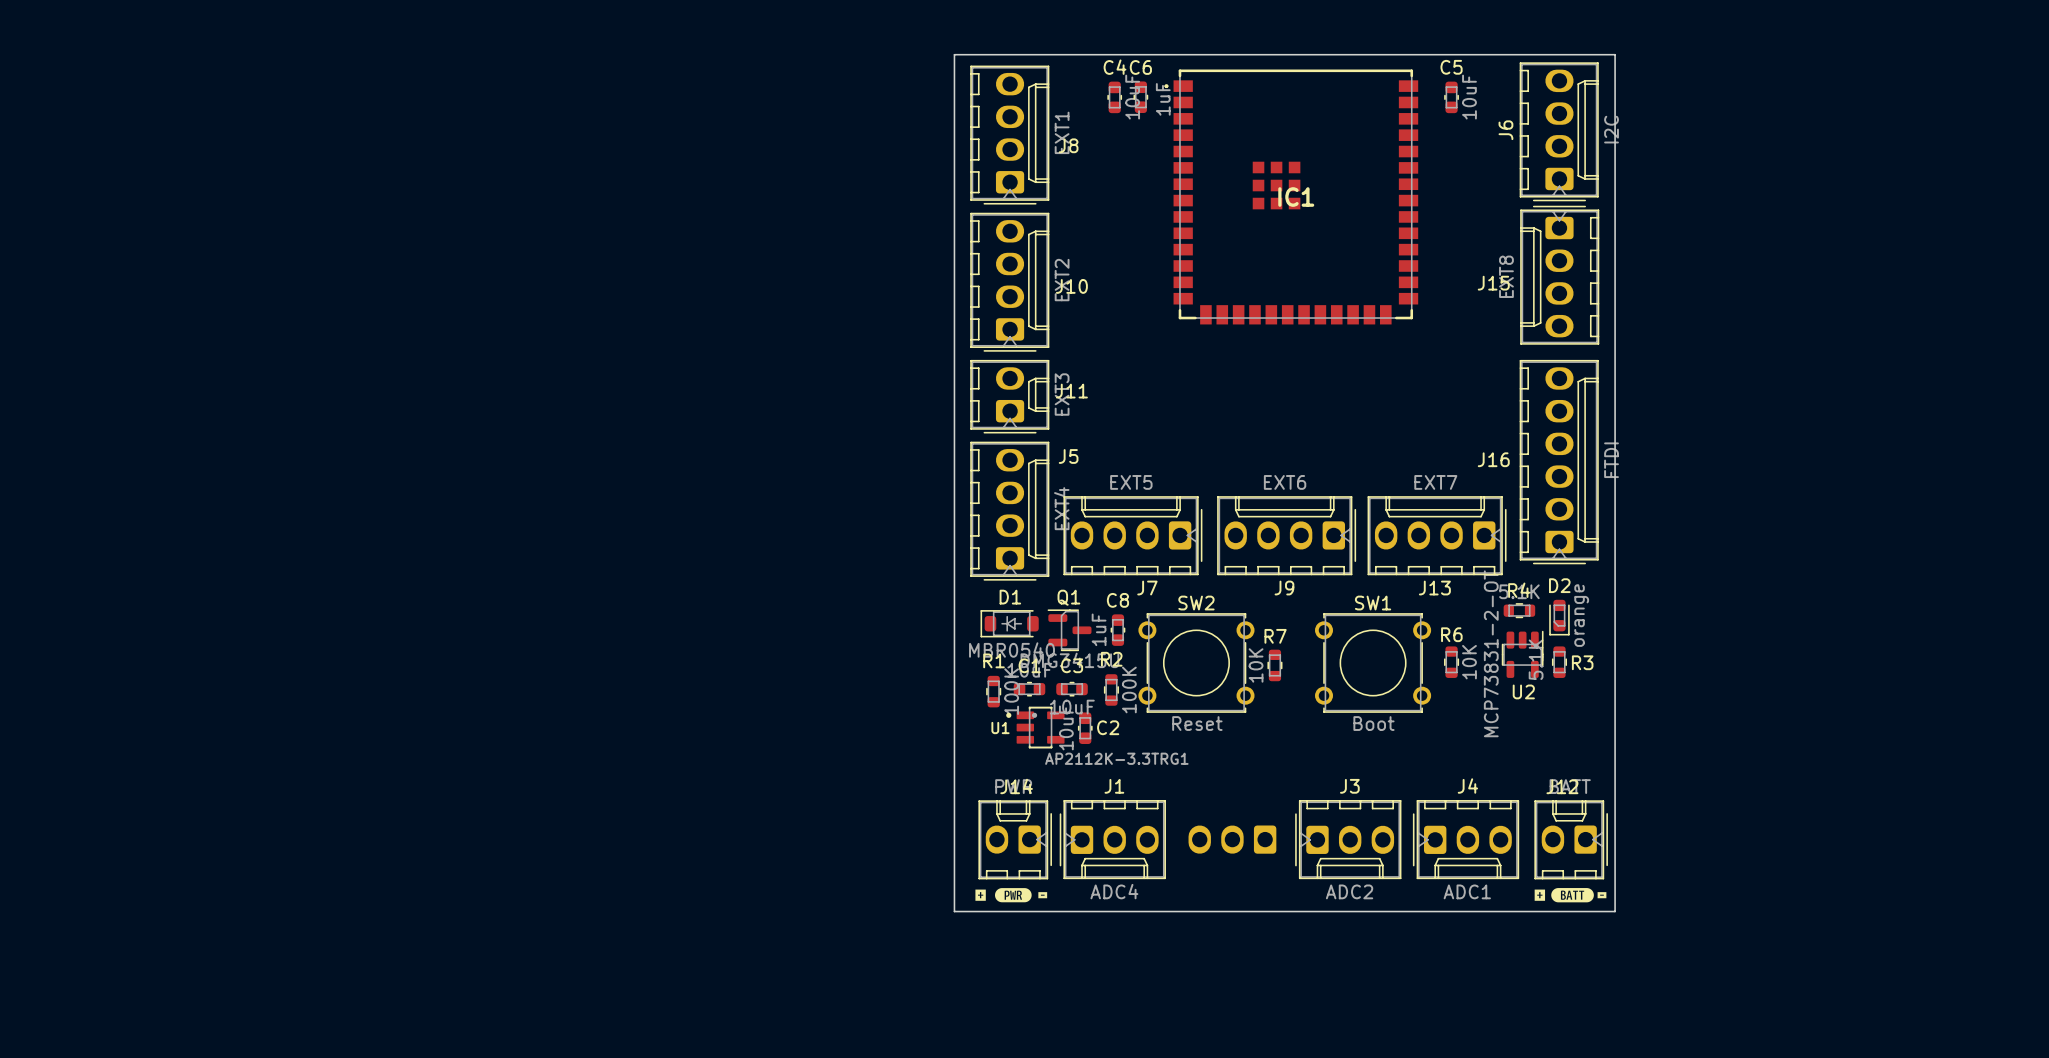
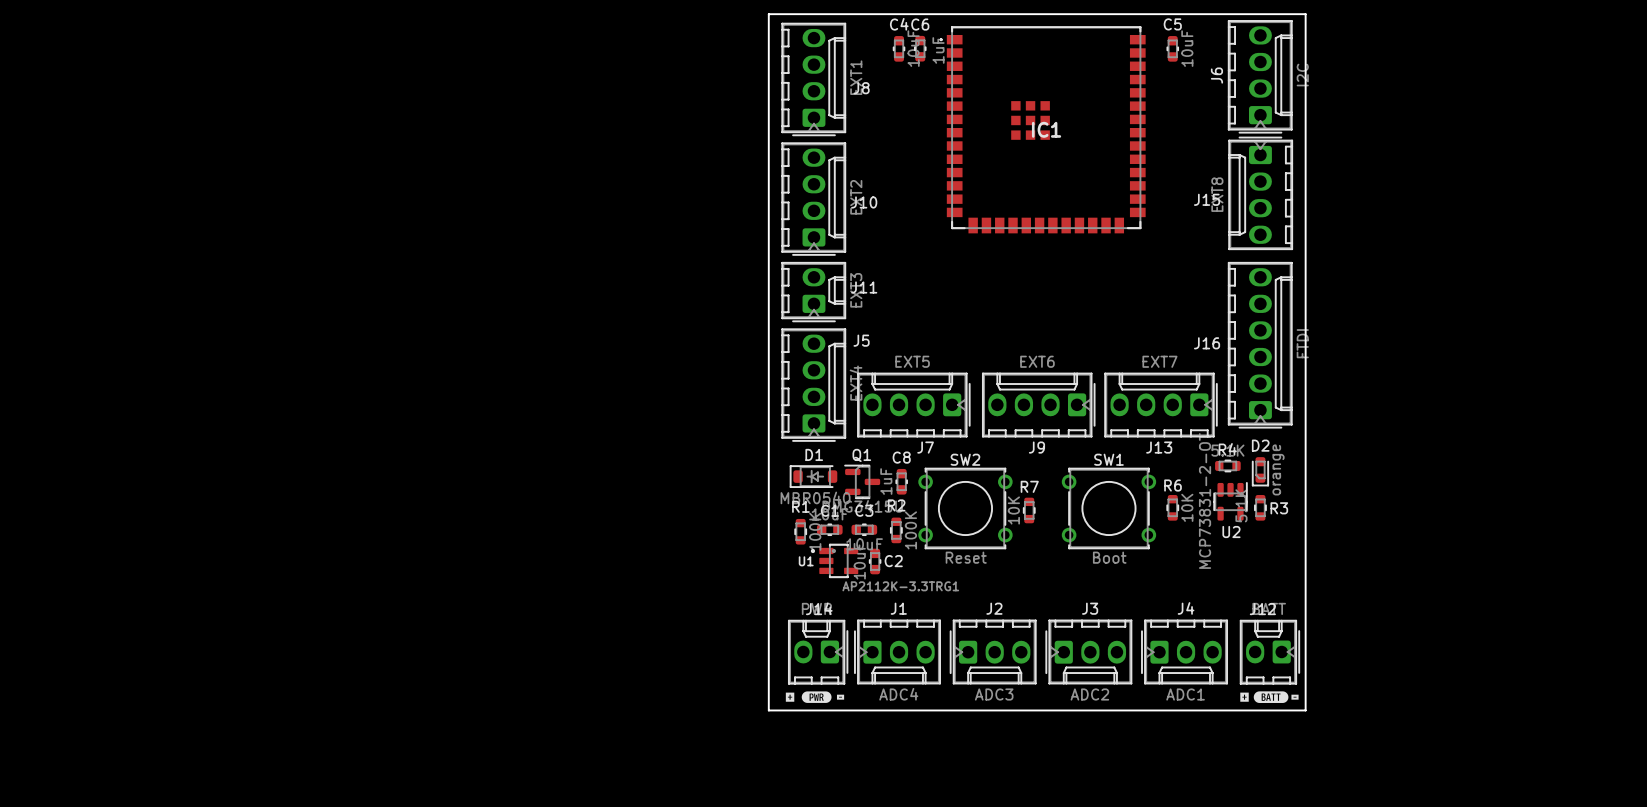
J2 side: bottom (1232, 839) -> top (993, 651)

